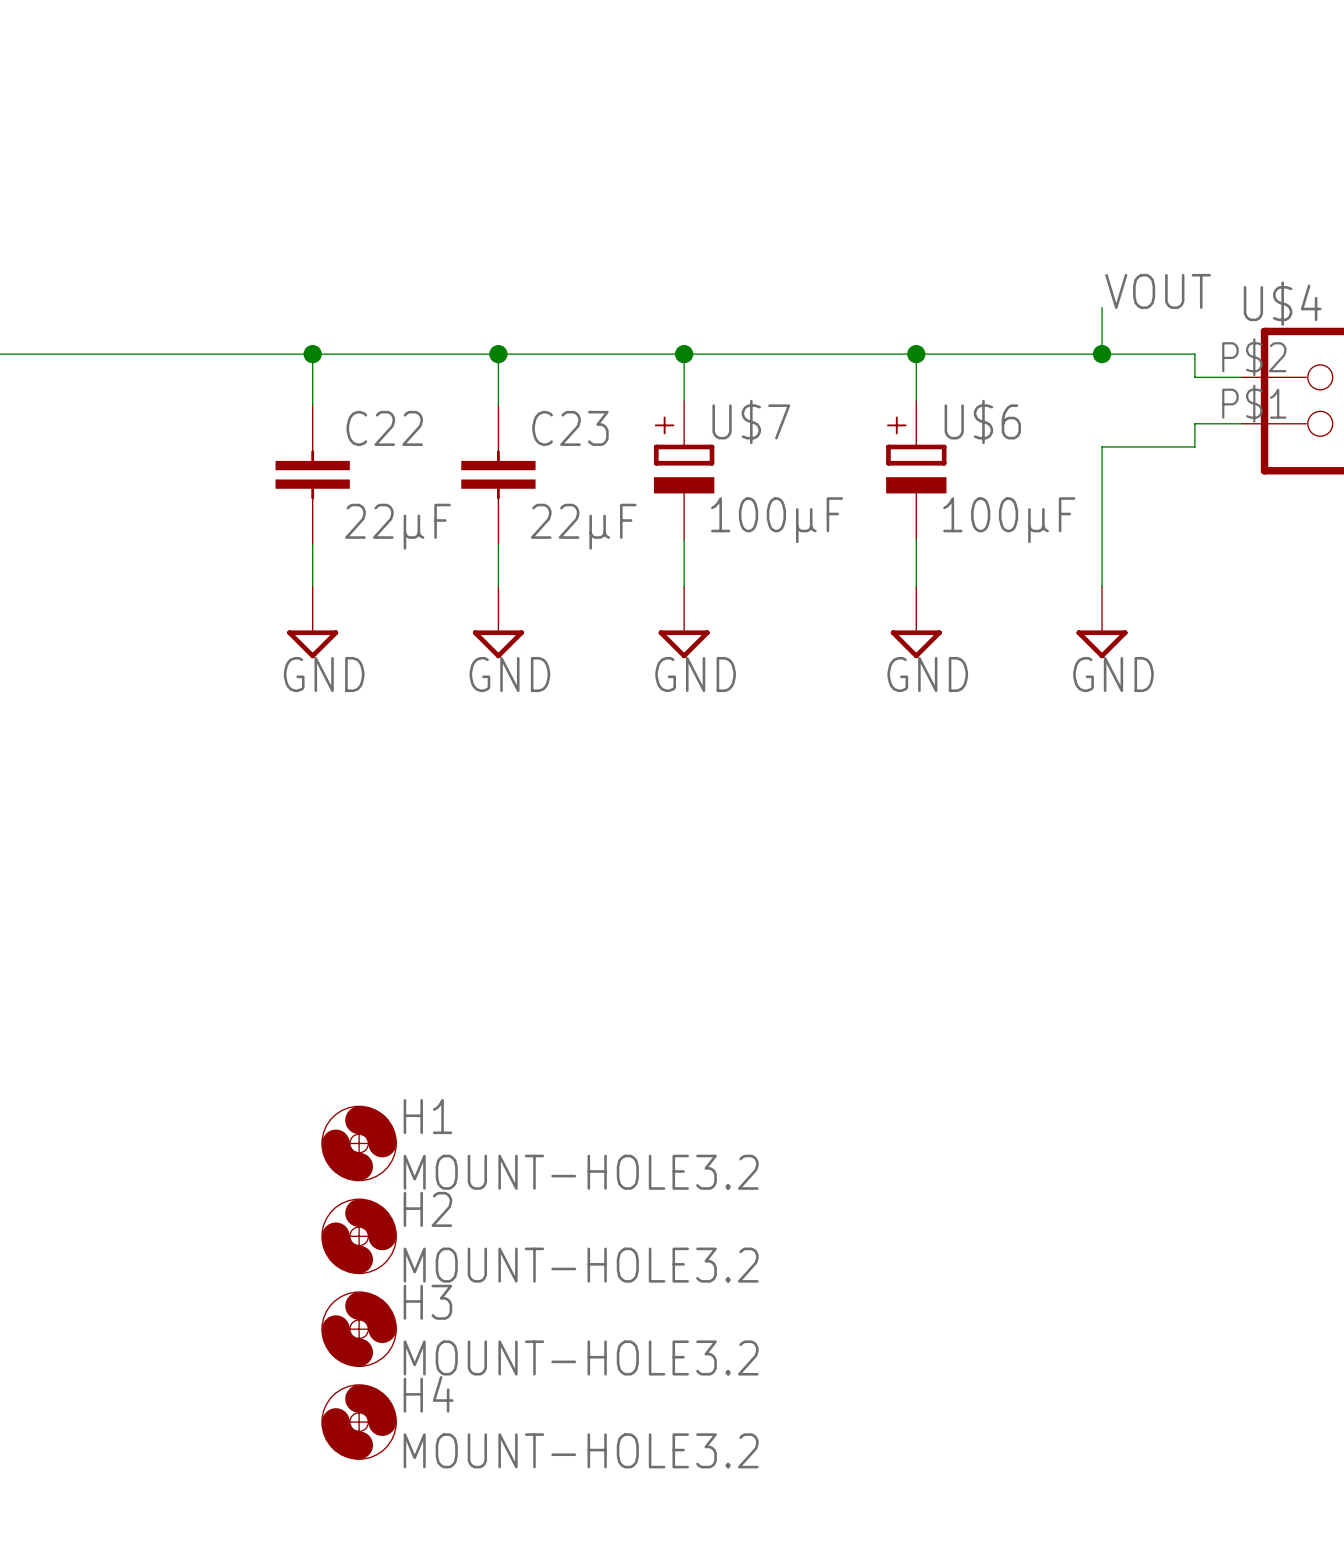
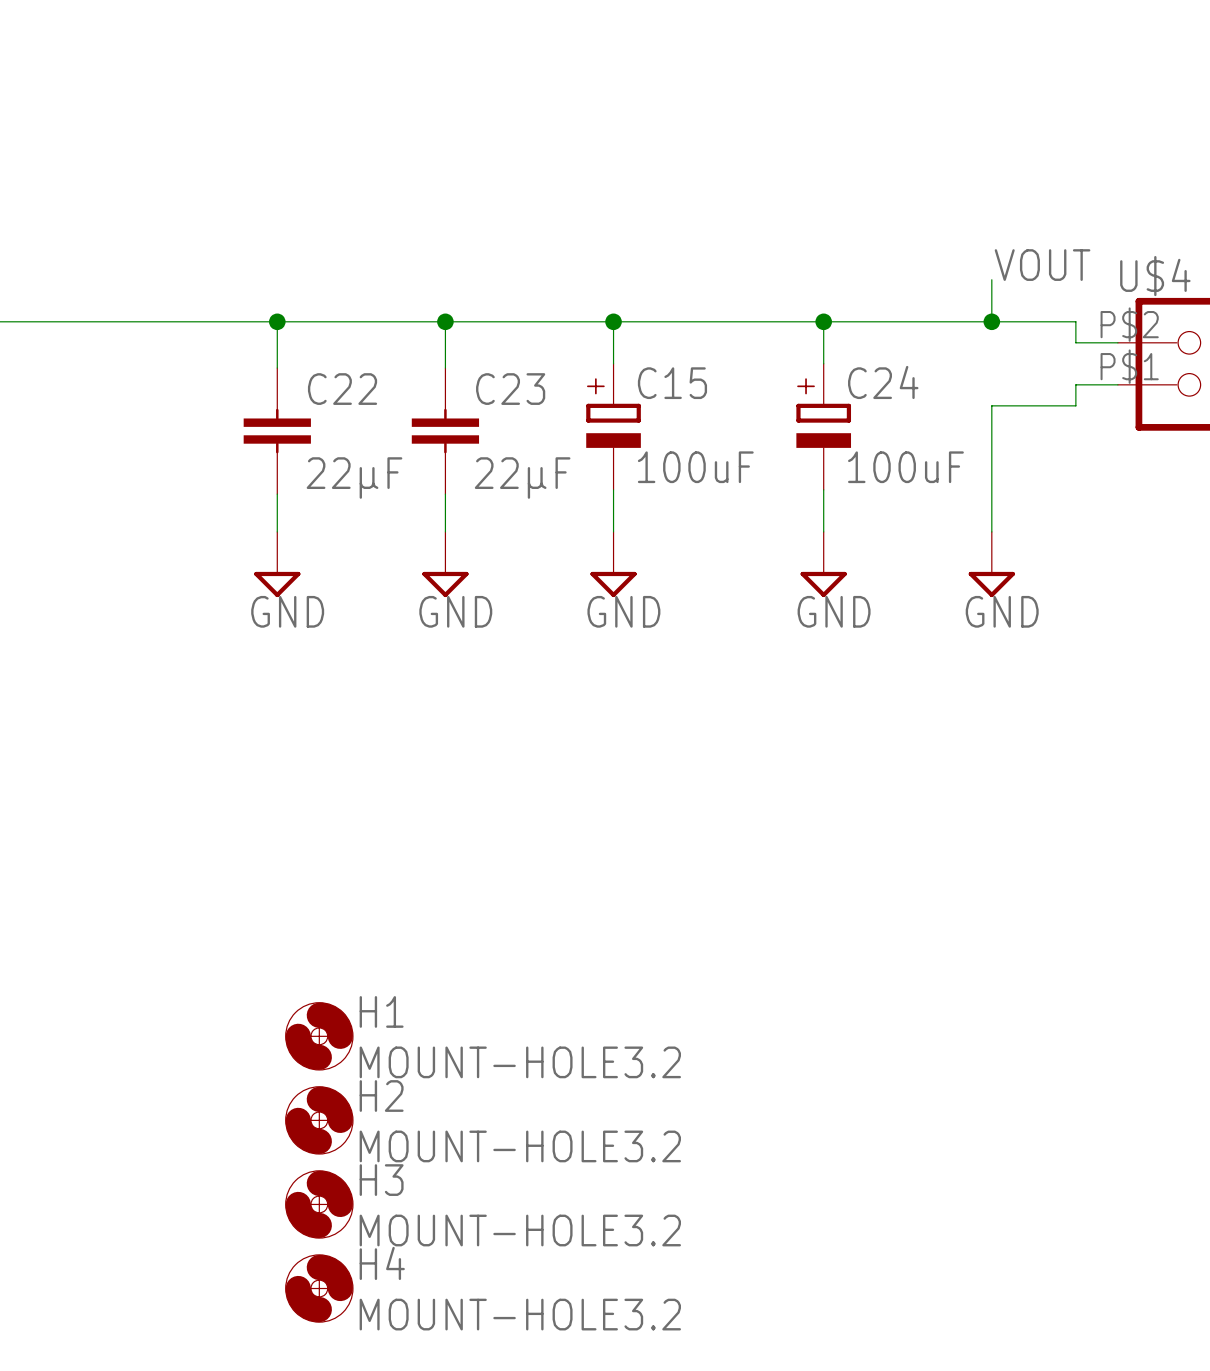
U$7 name: U$7 (751, 421) -> C15 (672, 383)
U$6 name: U$6 (982, 421) -> C24 (883, 382)
U$7 value: 100µF (777, 520) -> 100uF (695, 467)
U$6 value: 100µF (1009, 520) -> 100uF (905, 467)

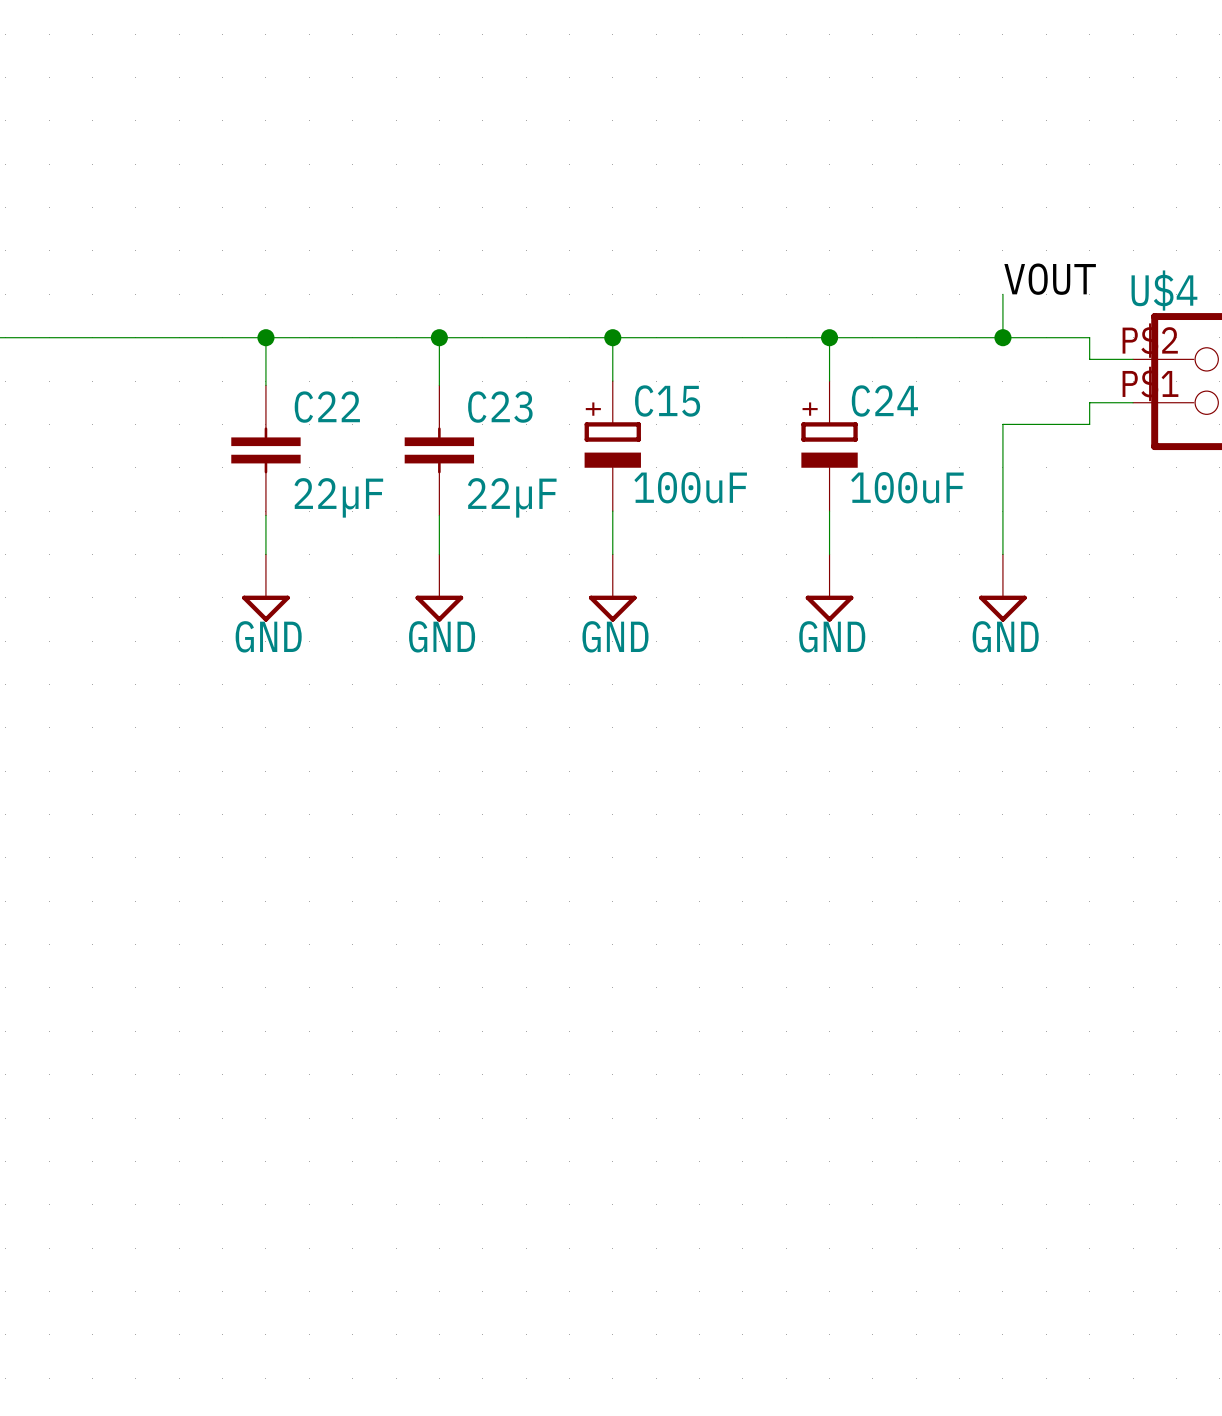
H1: MOUNT-HOLE3.2 (319, 1036) -> none
H2: MOUNT-HOLE3.2 (319, 1120) -> none
H3: MOUNT-HOLE3.2 (319, 1204) -> none
H4: MOUNT-HOLE3.2 (319, 1288) -> none

